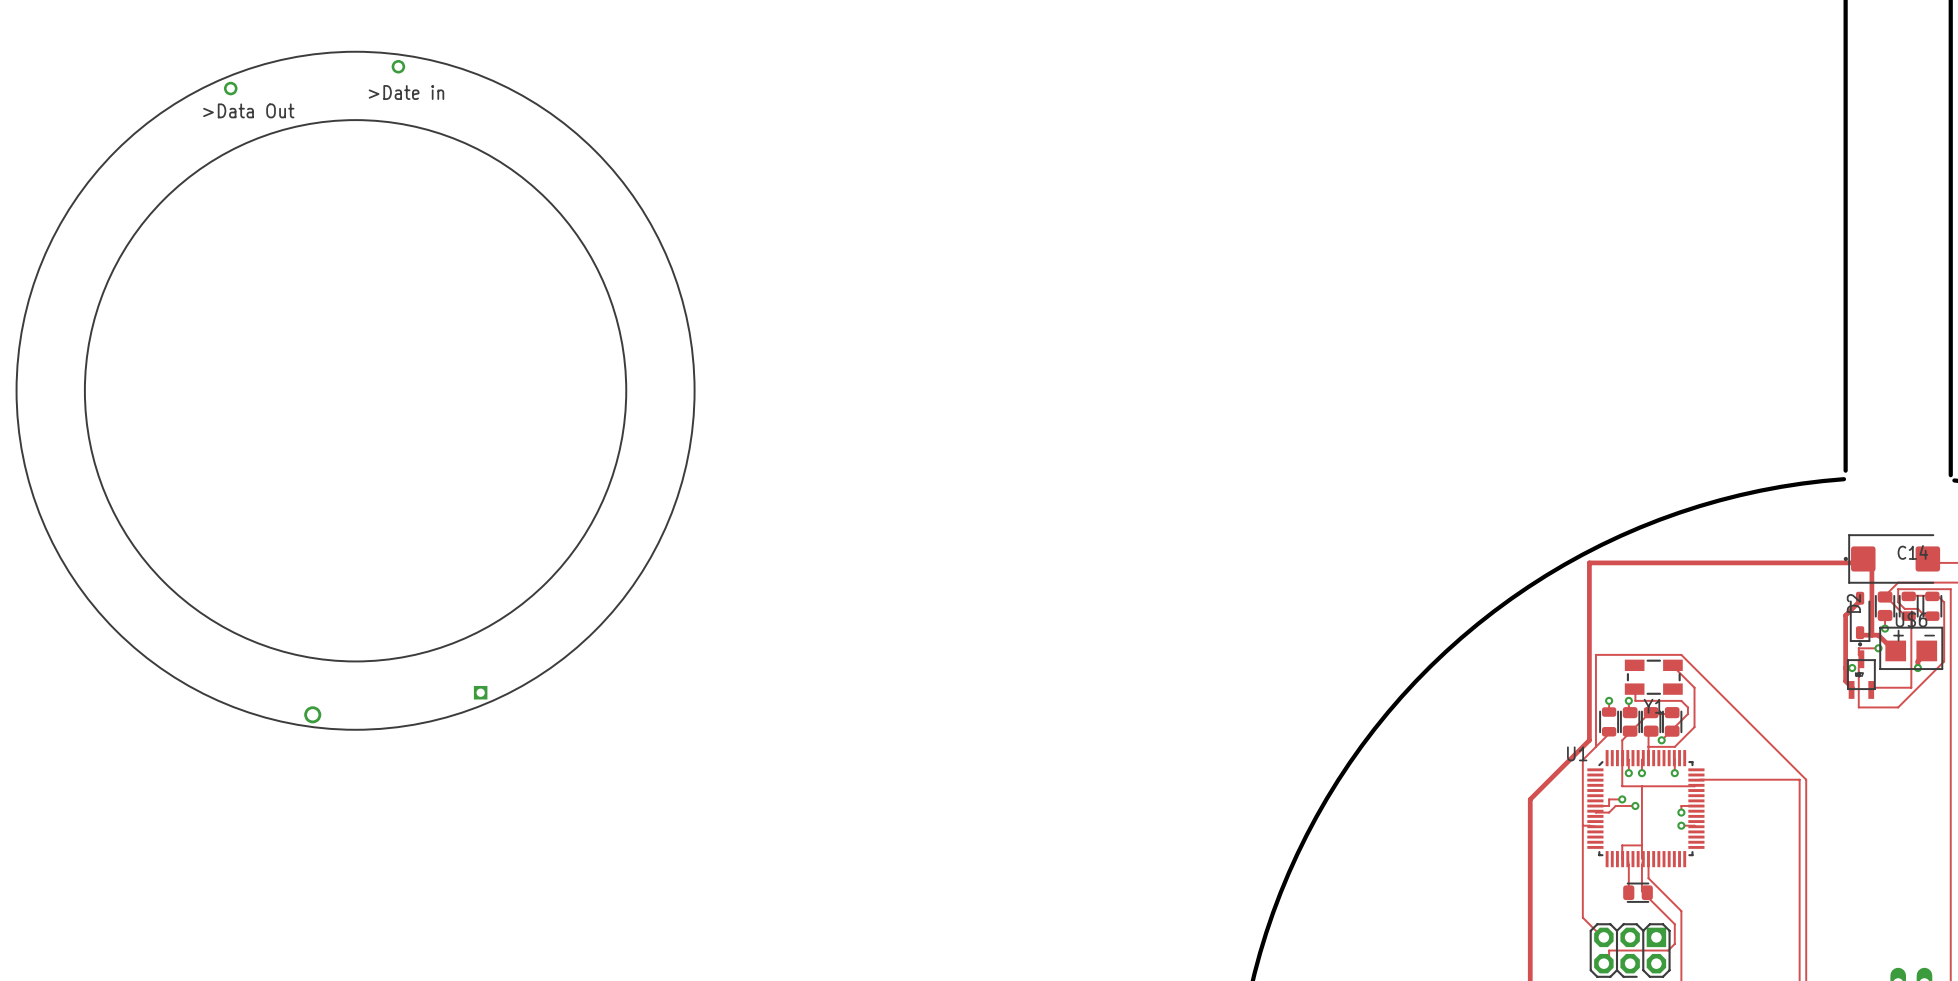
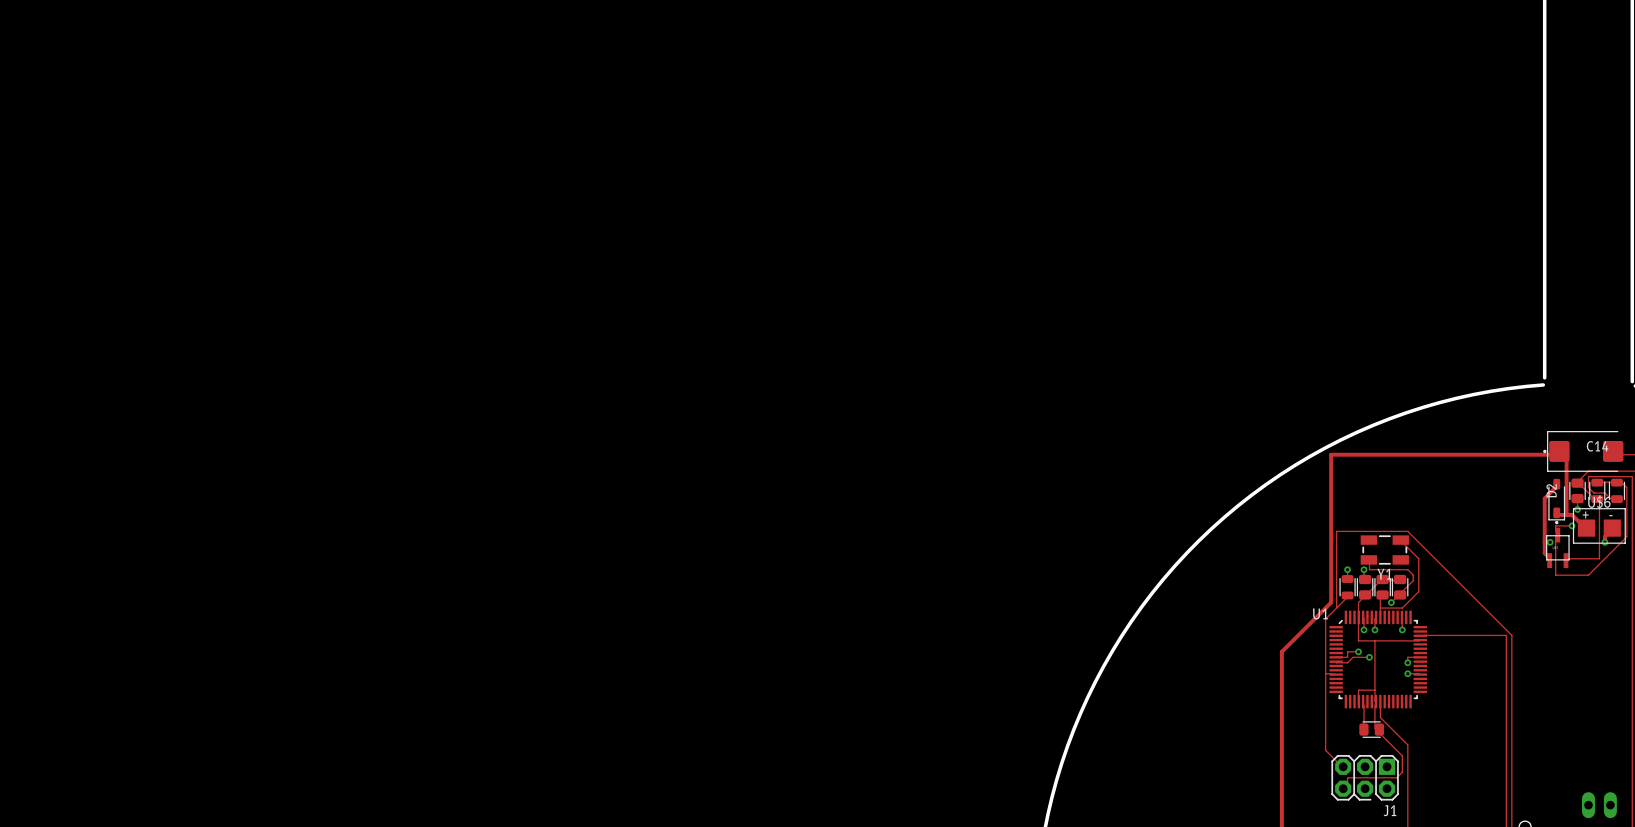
part: (355, 390) -> none

